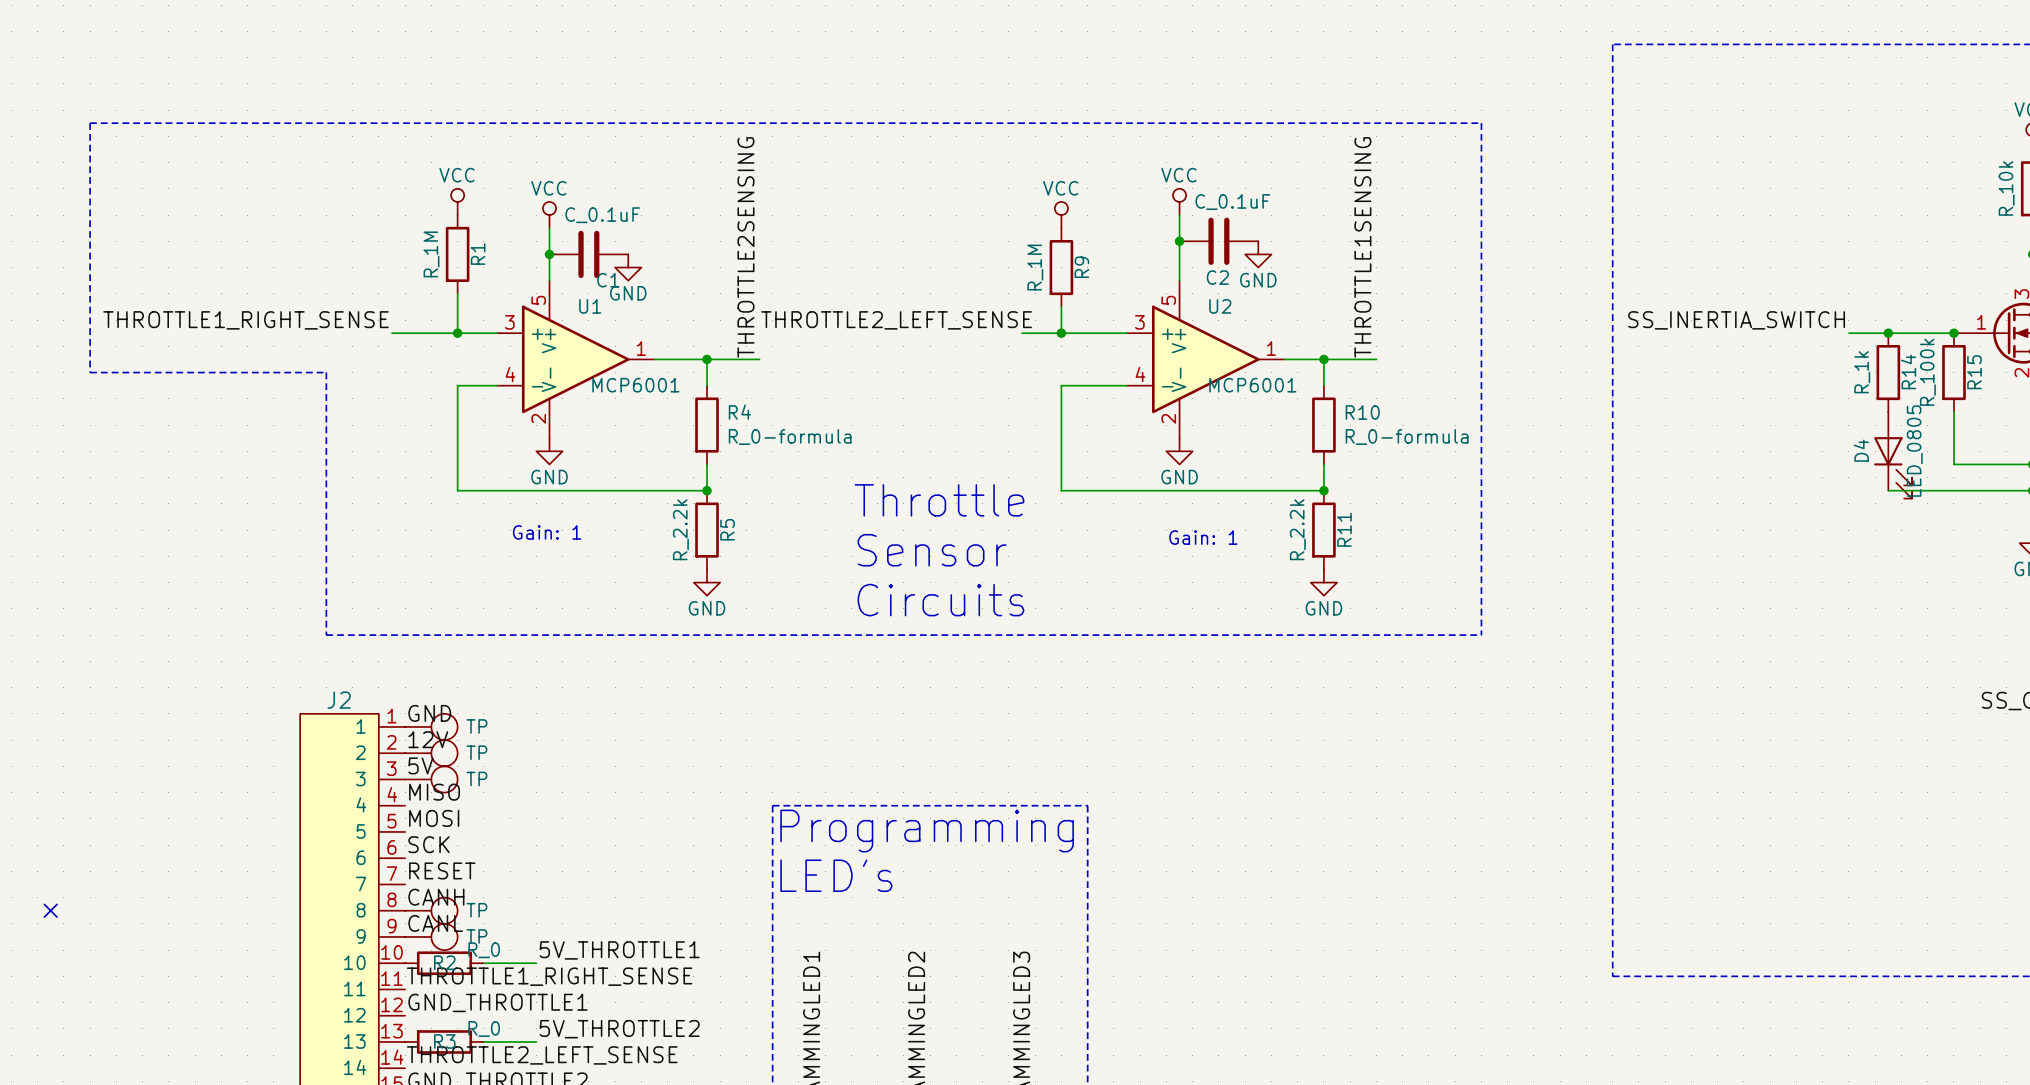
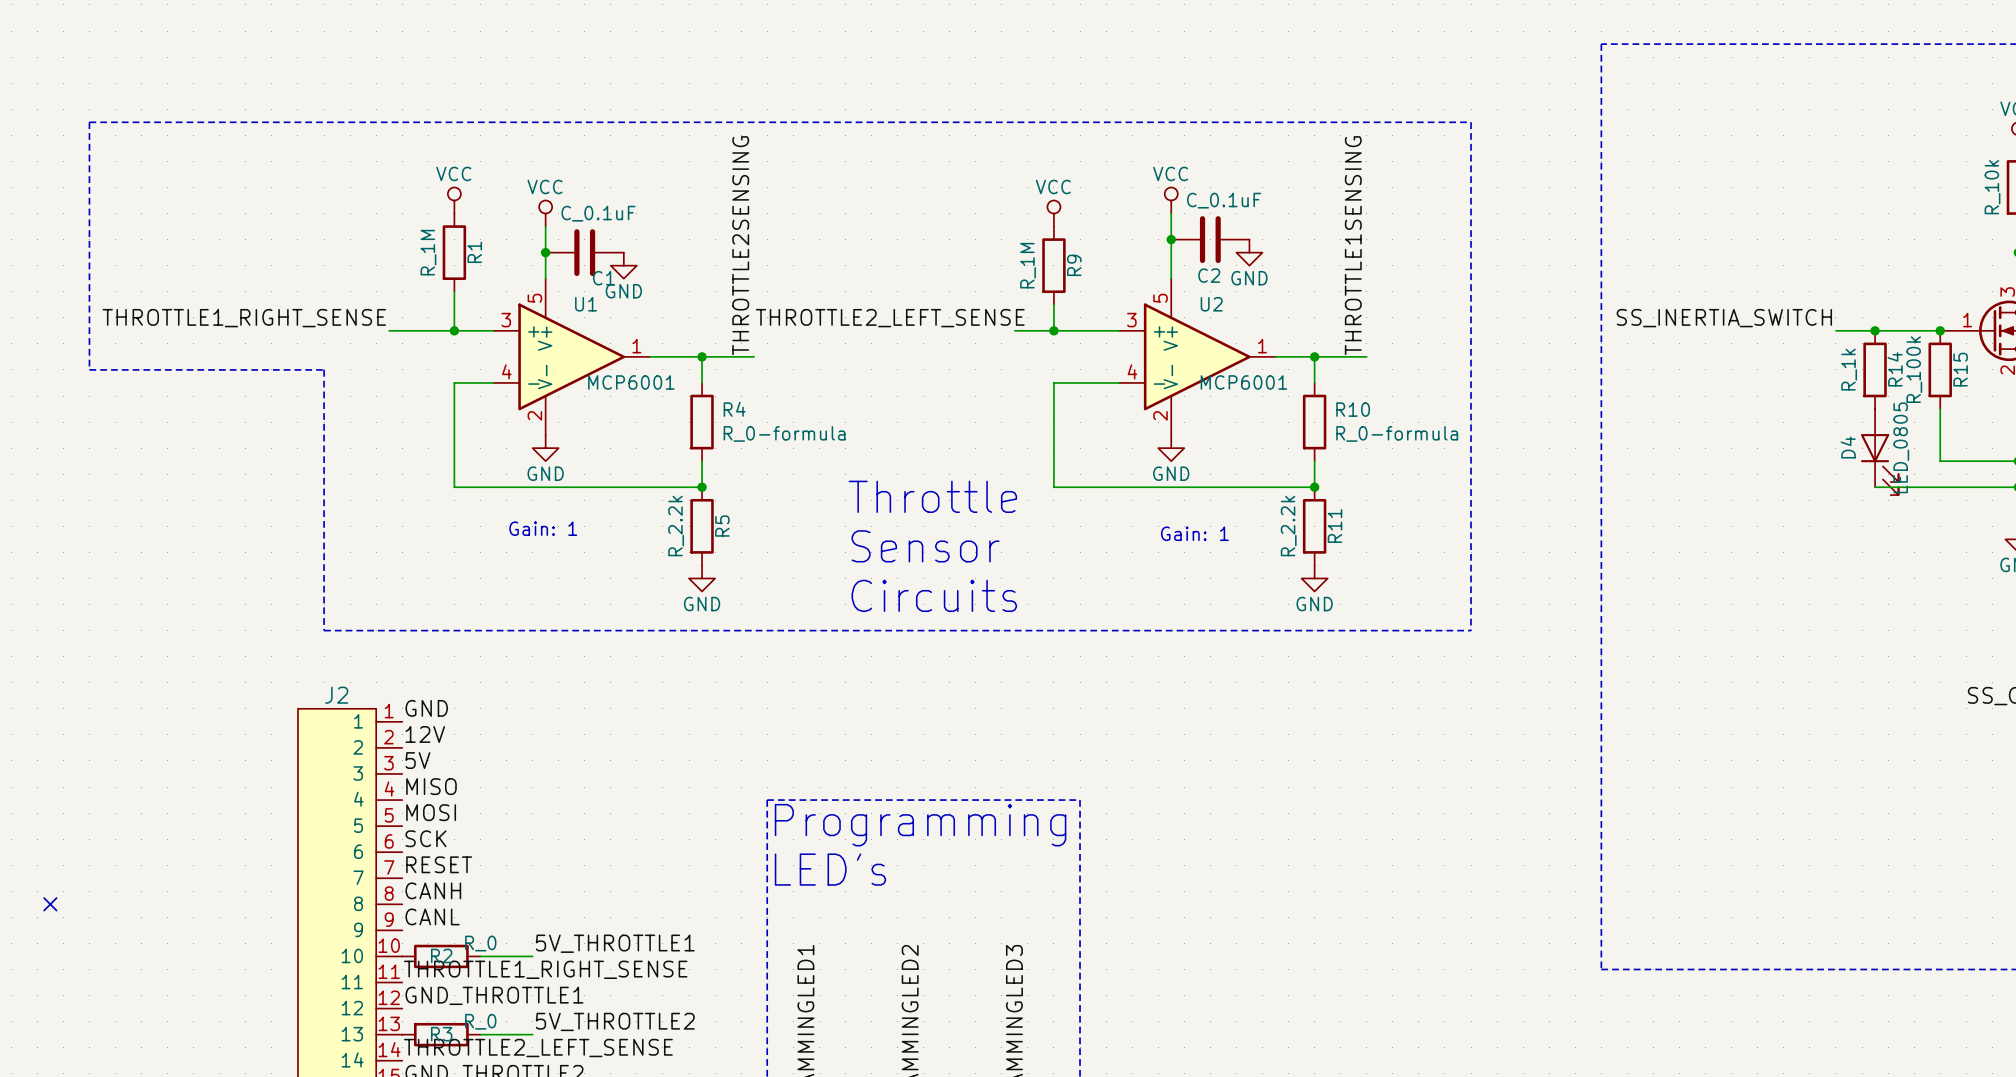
TP: (431, 726) -> none
TP: (431, 753) -> none
TP: (431, 779) -> none
TP: (431, 910) -> none
TP: (431, 936) -> none

